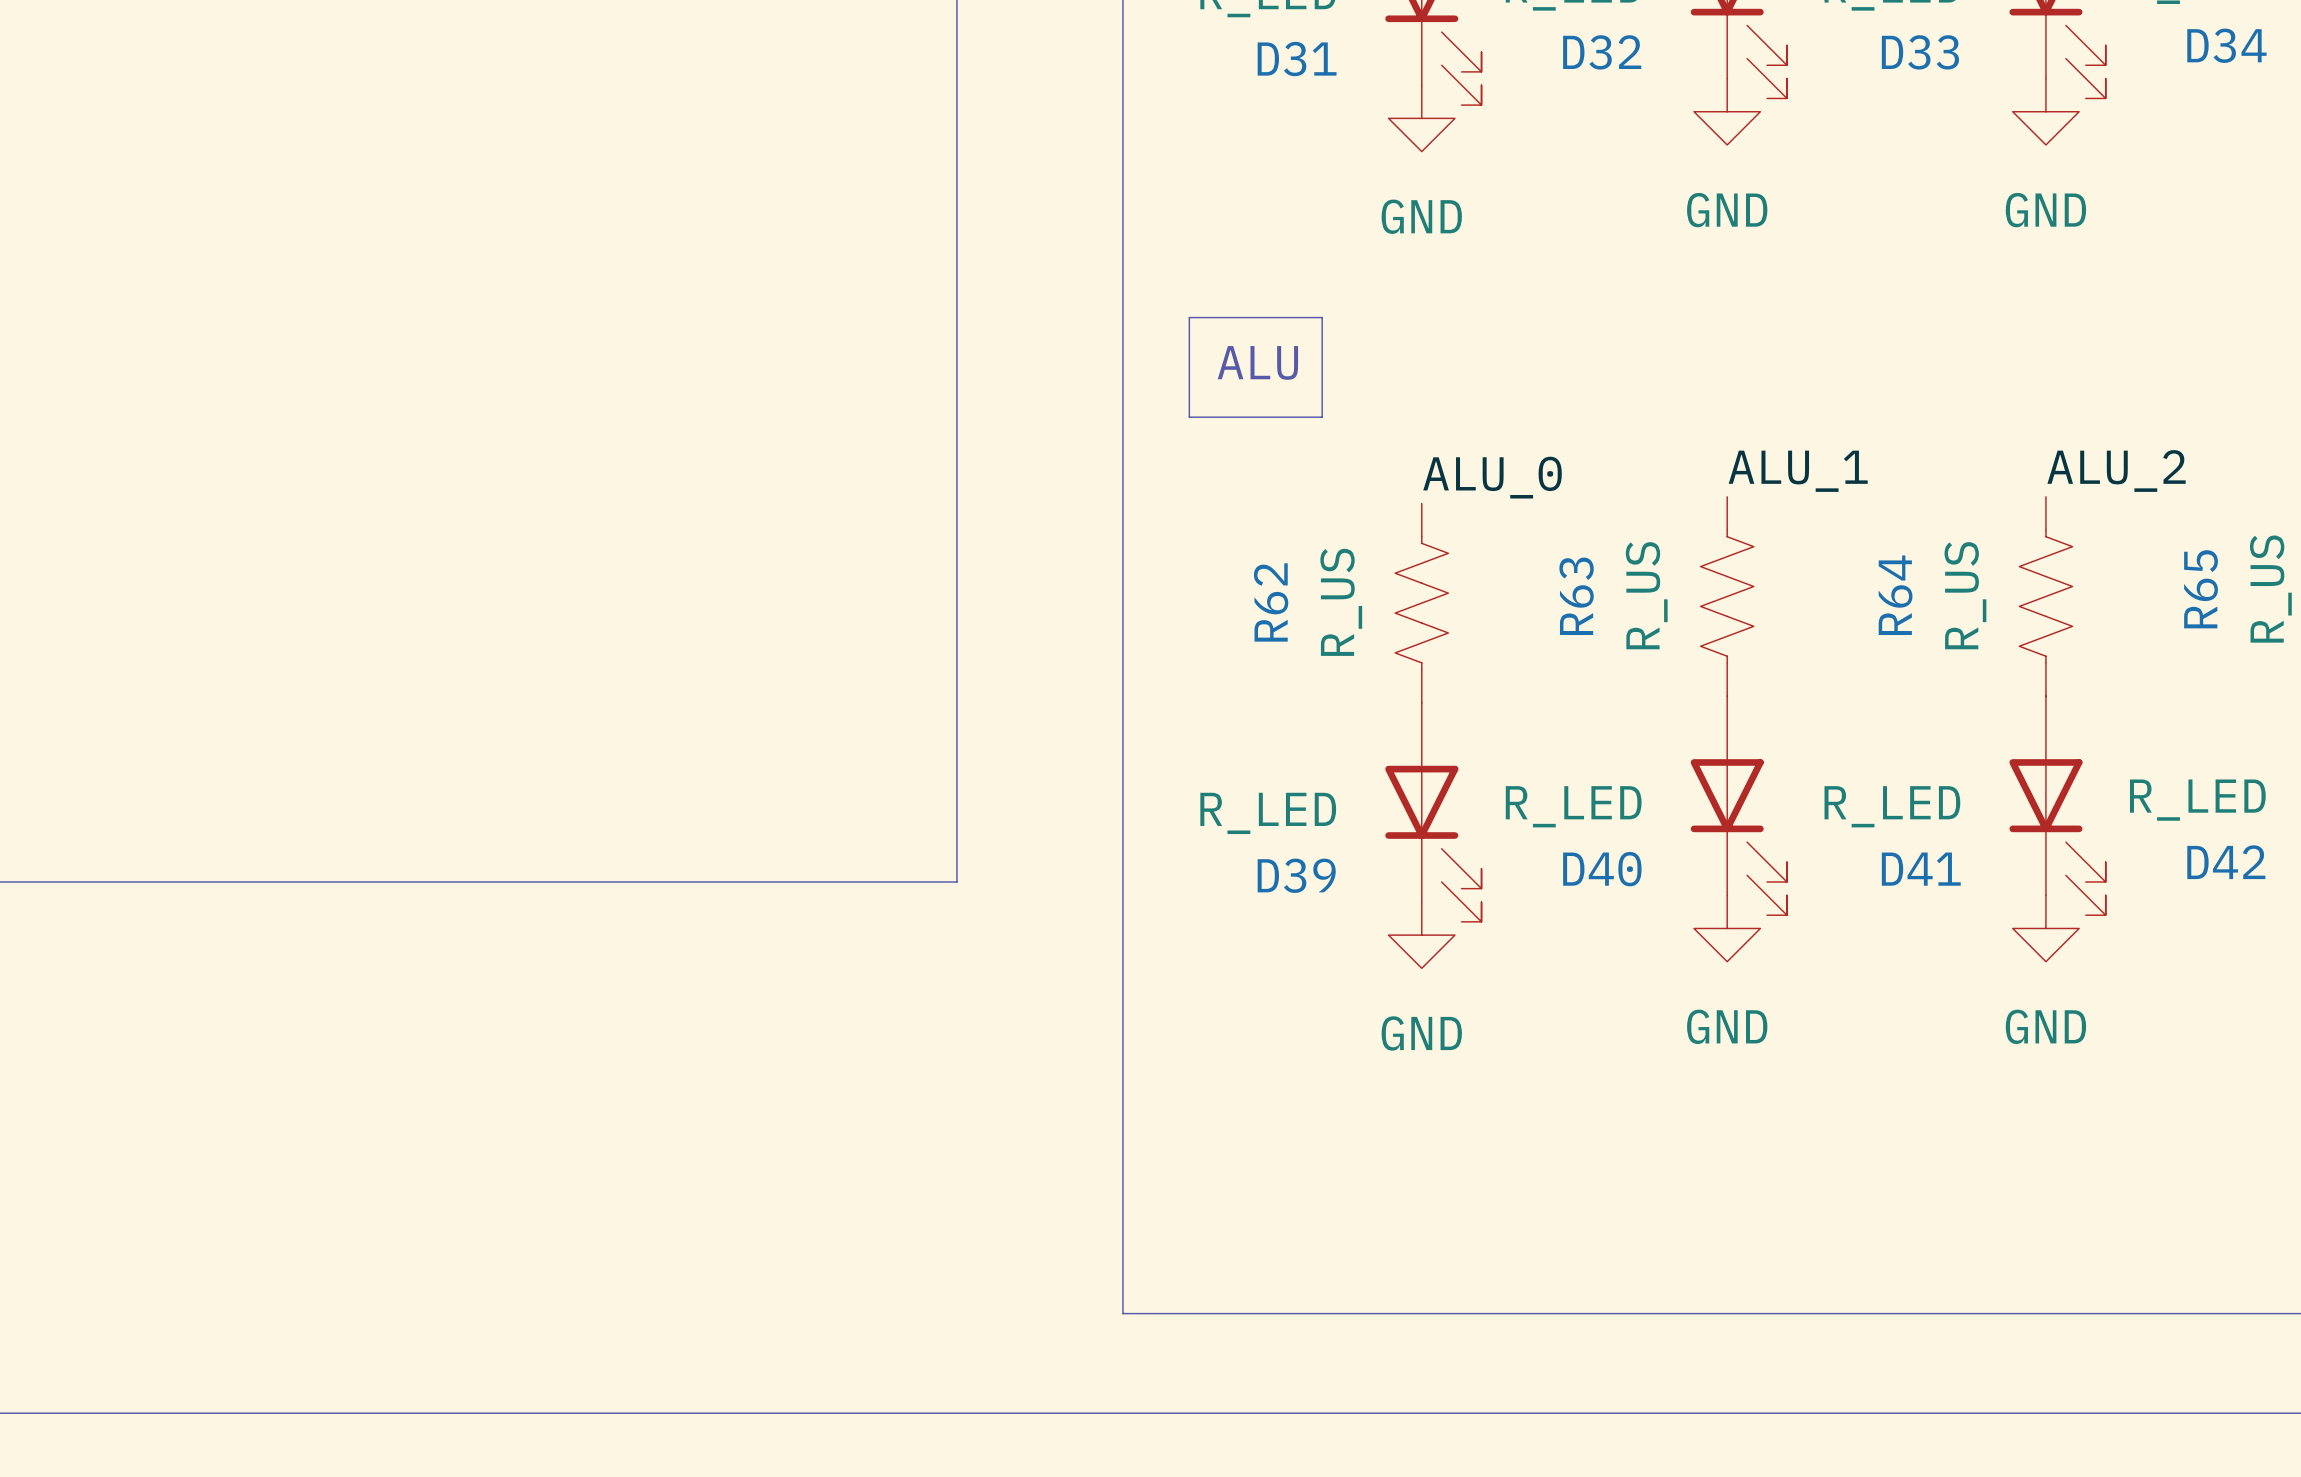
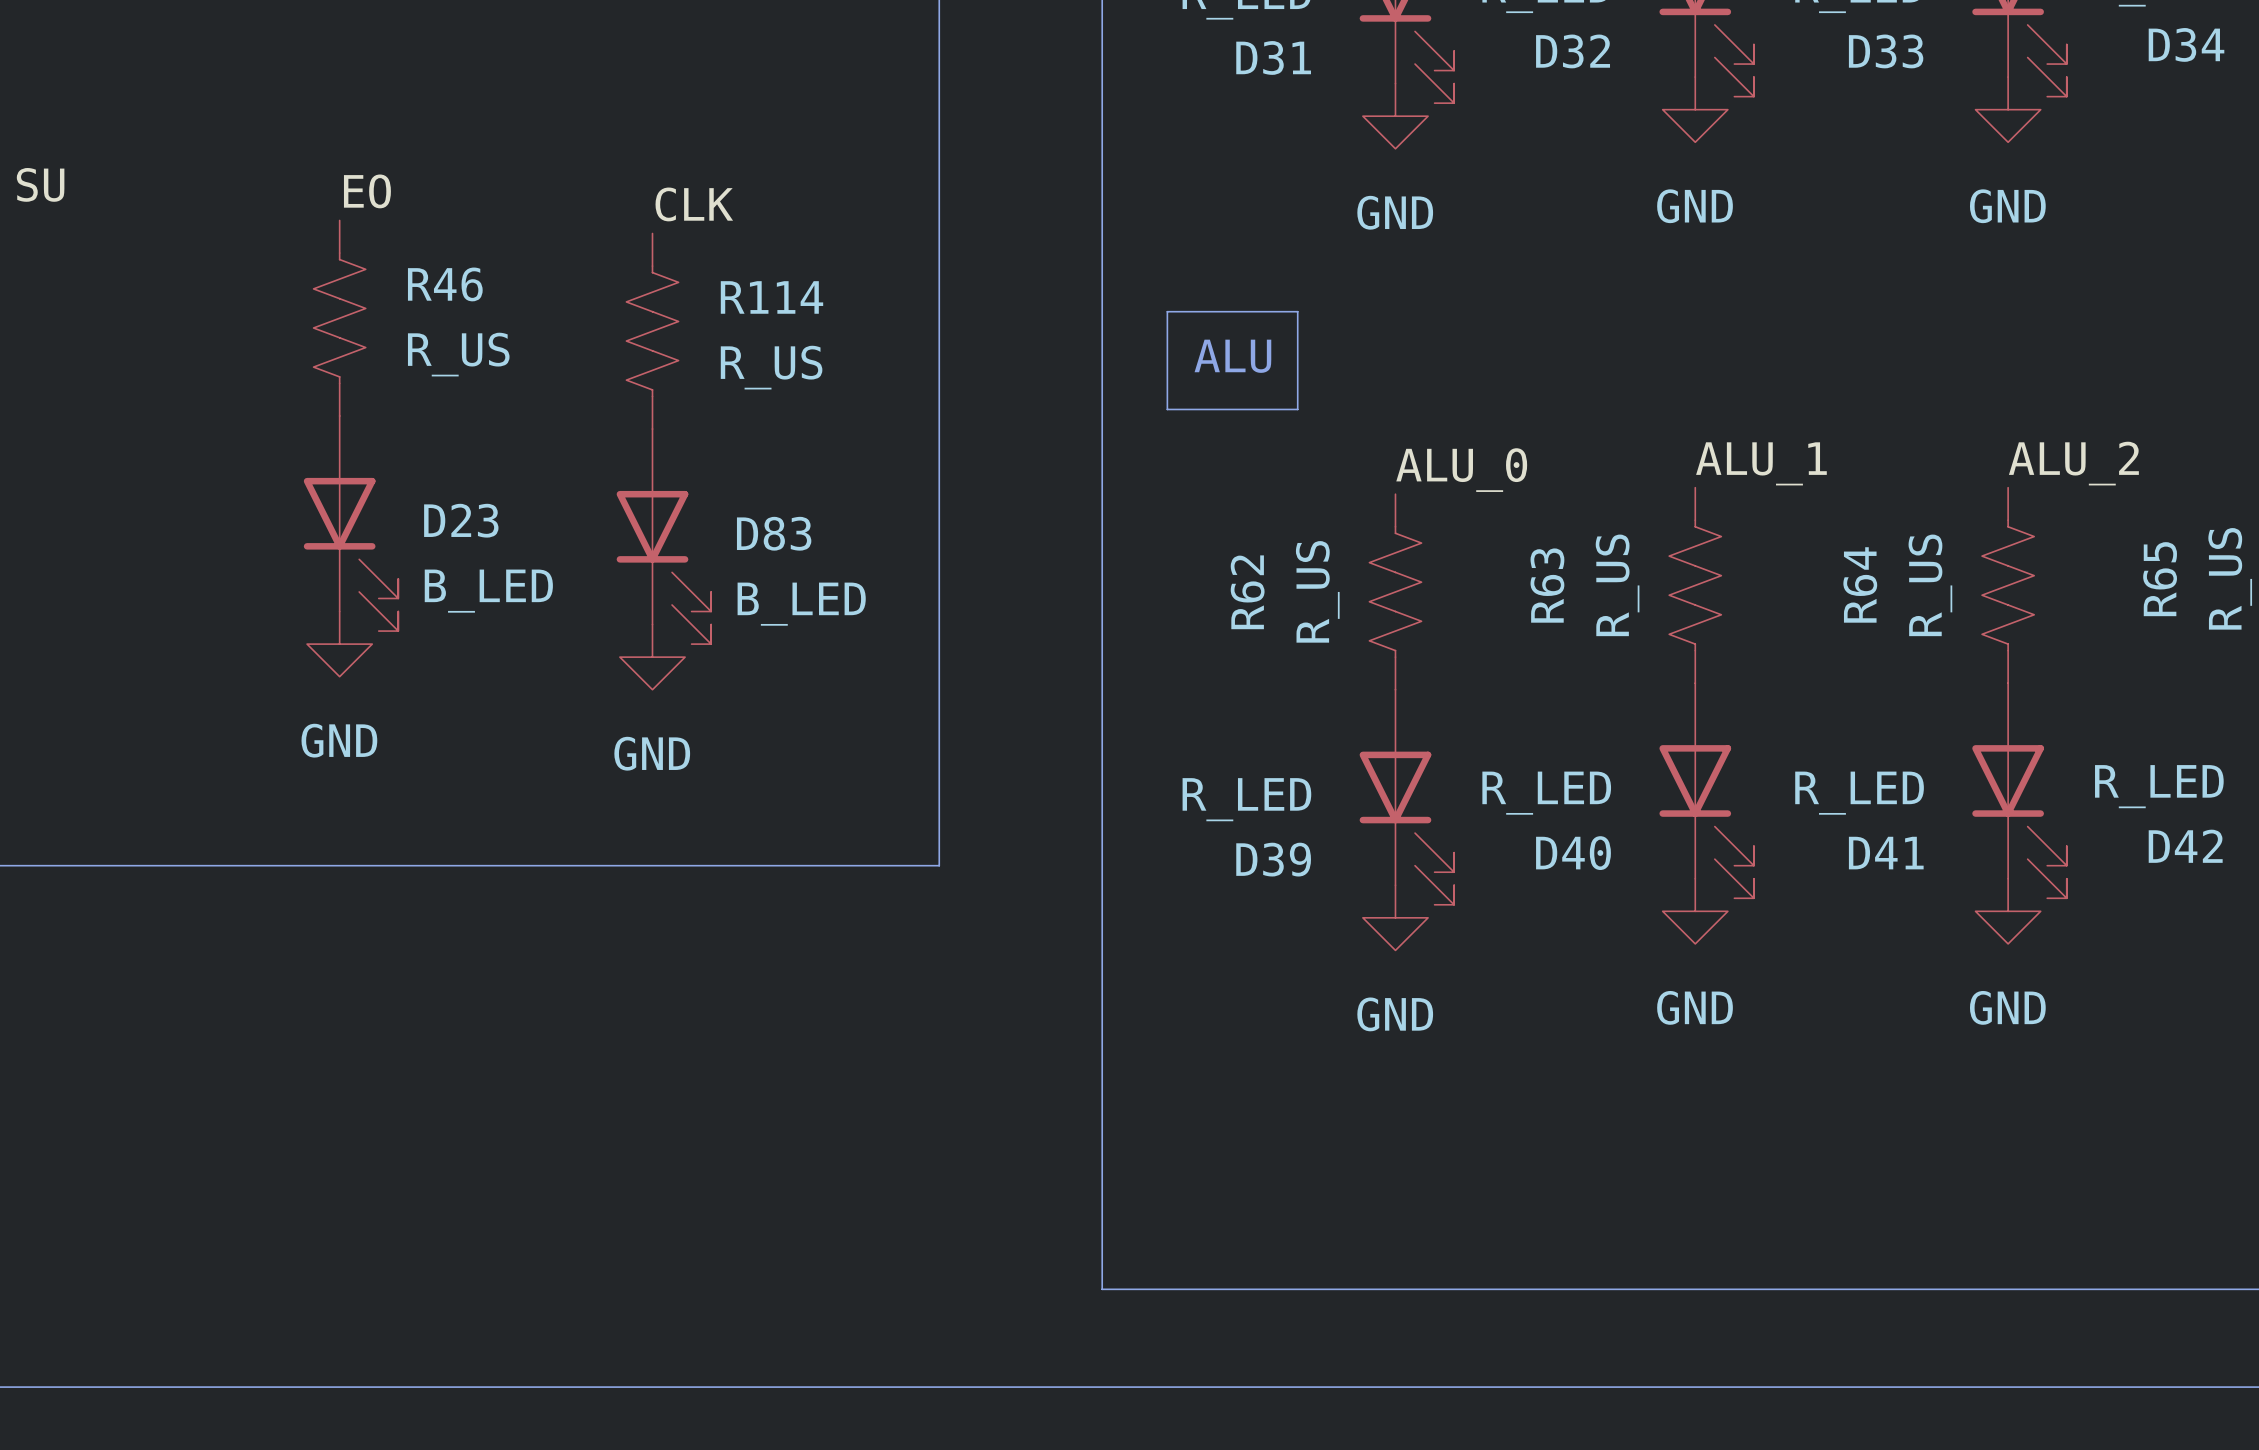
label: none -> SU (40, 184)
label: none -> EO (367, 191)
label: none -> CLK (694, 204)
R46: none -> R_US (339, 318)
R114: none -> R_US (652, 331)
D23: none -> B_LED (351, 523)
D83: none -> B_LED (663, 536)
power symbol: none -> GND (339, 644)
power symbol: none -> GND (652, 657)

